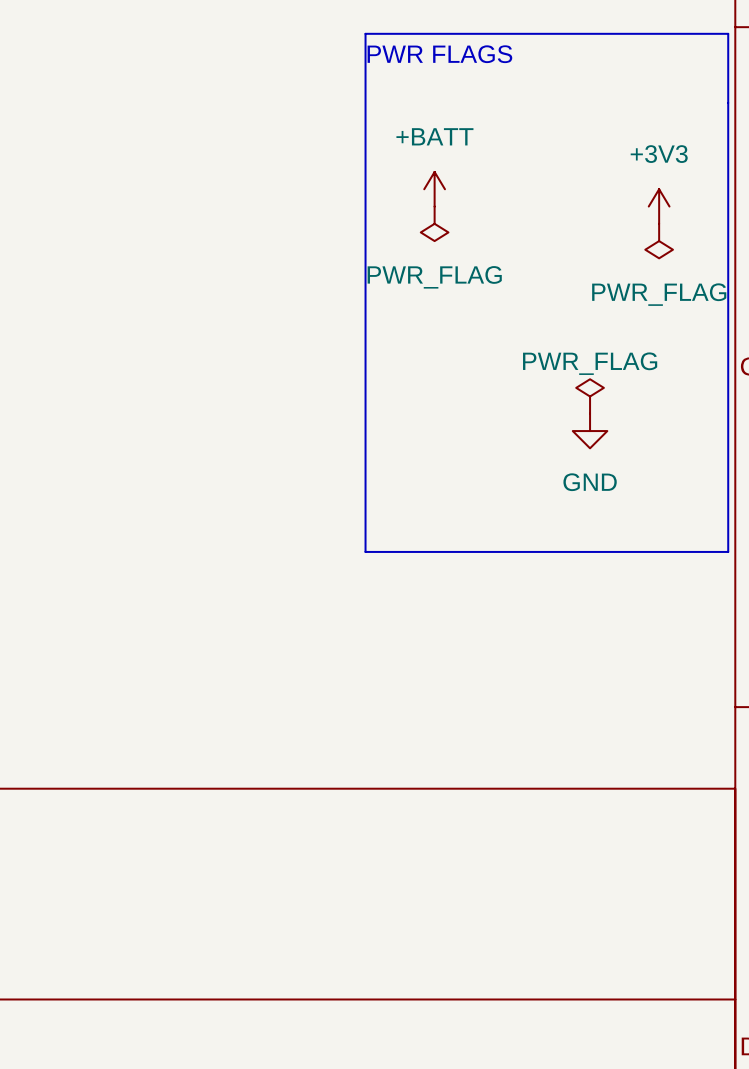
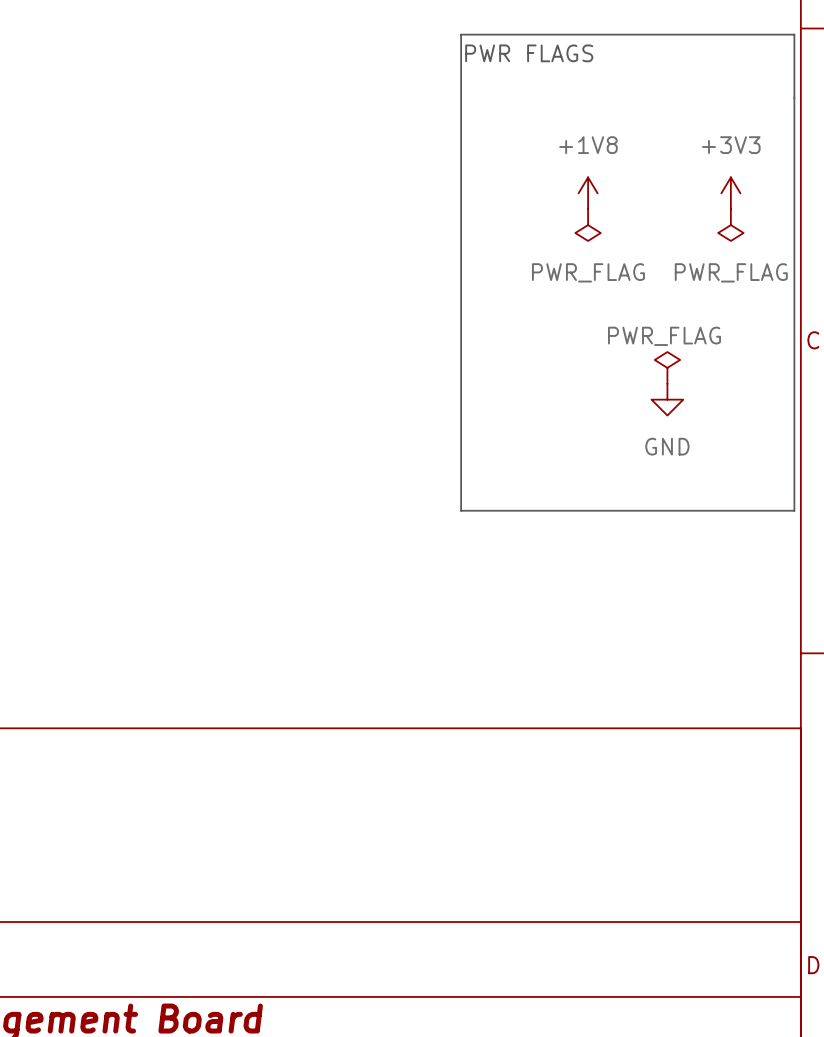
power symbol: +BATT (434, 189) -> none
power symbol: none -> +1V8 (588, 193)
power symbol position: PWR_FLAG (434, 223) -> PWR_FLAG (588, 225)

